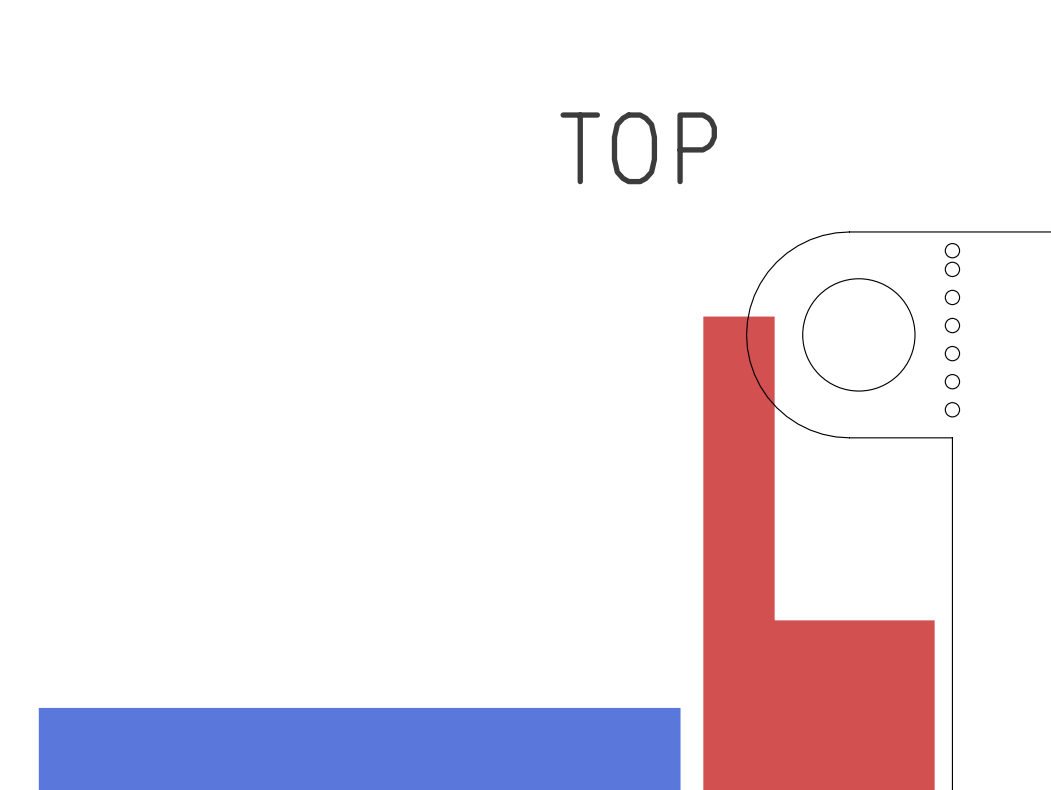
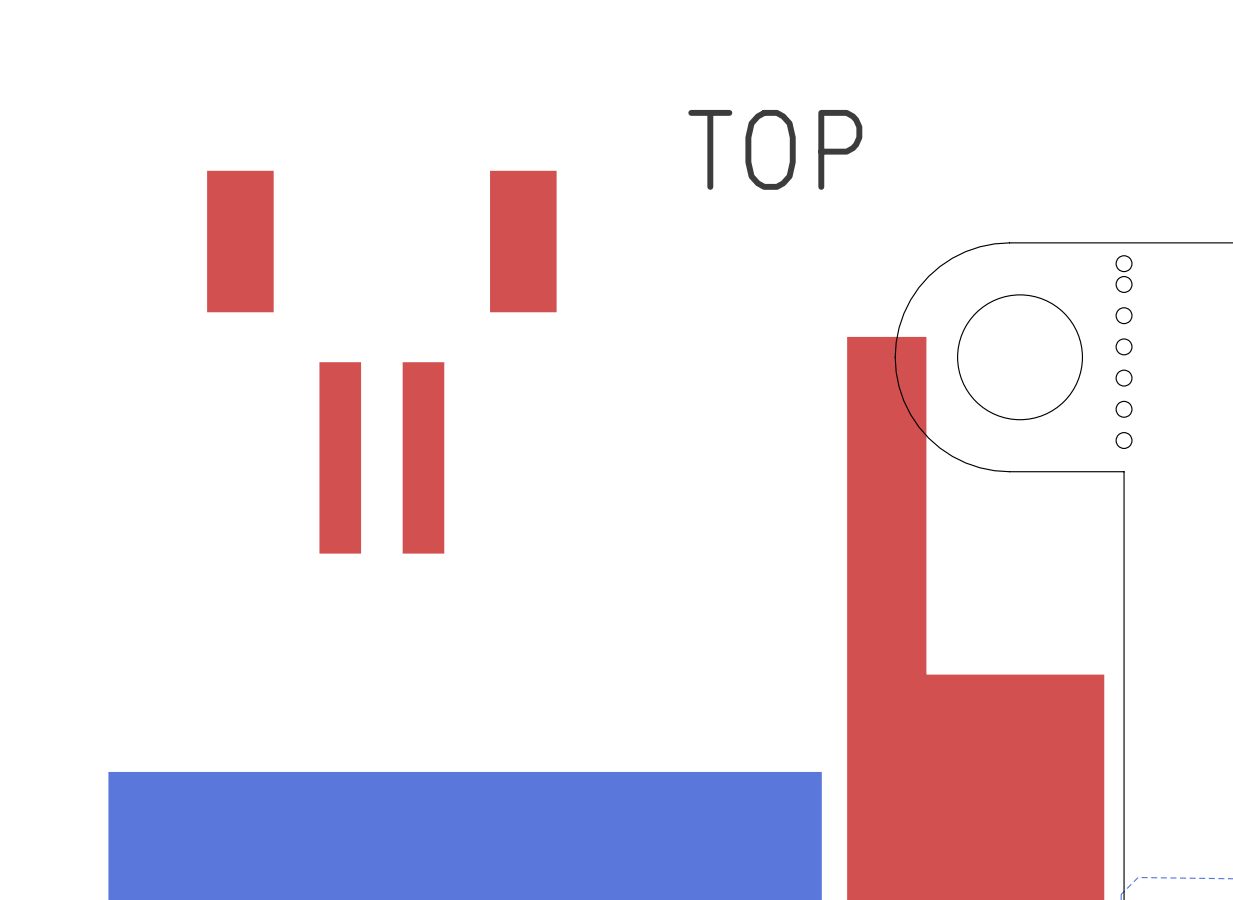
part: none -> (381, 362)

